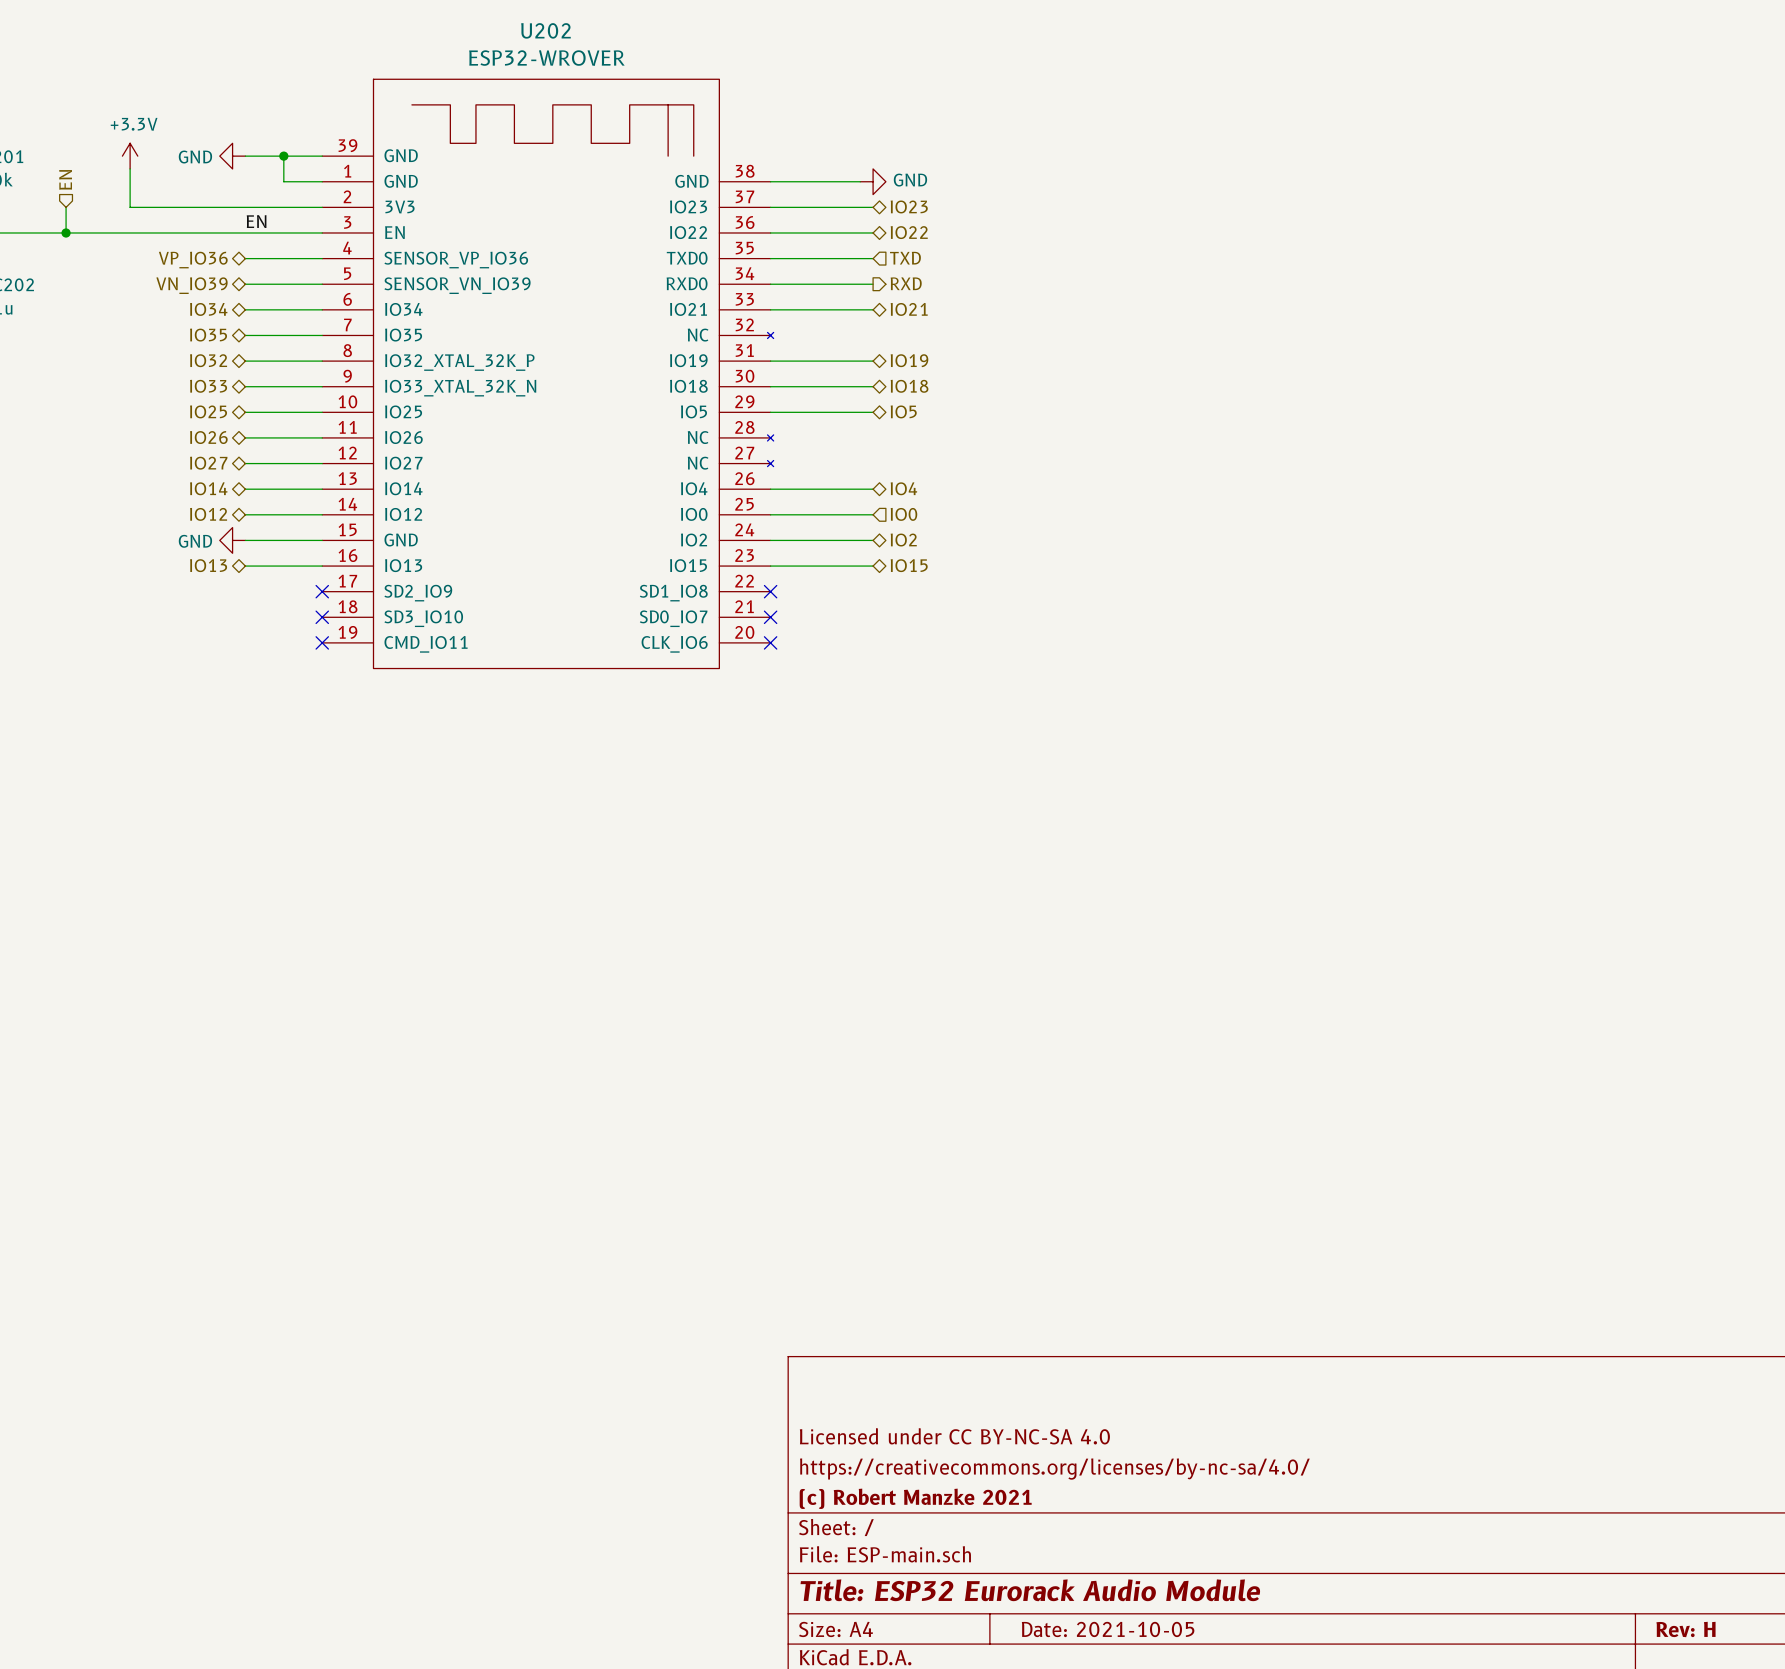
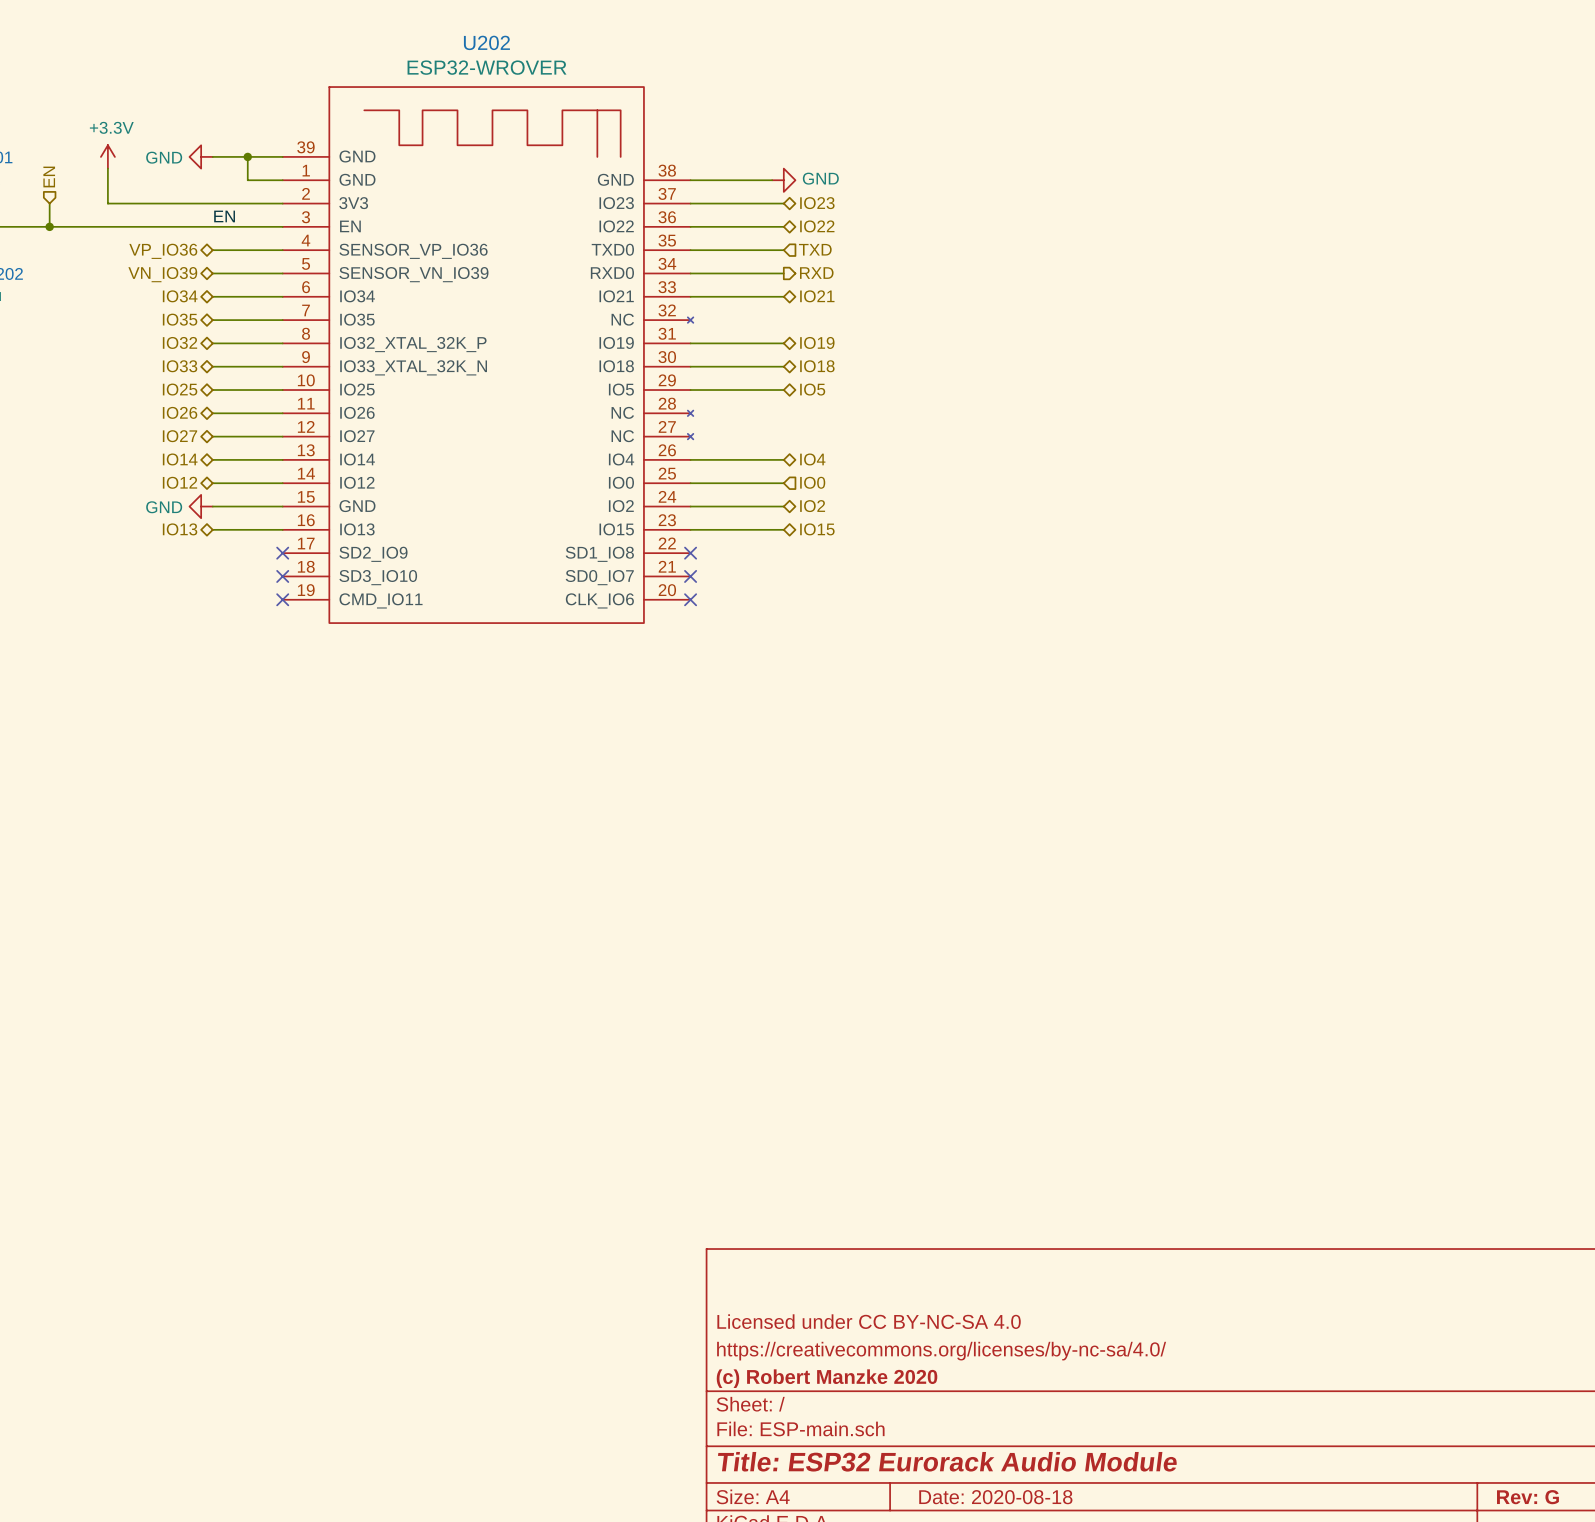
title block: (c) Robert Manzke 2021 (915, 1498) -> (c) Robert Manzke 2020 (827, 1378)
title block: Date: 2021-10-05 (1108, 1629) -> Date: 2020-08-18 (995, 1497)
title block: Rev: H (1686, 1629) -> Rev: G (1527, 1497)

